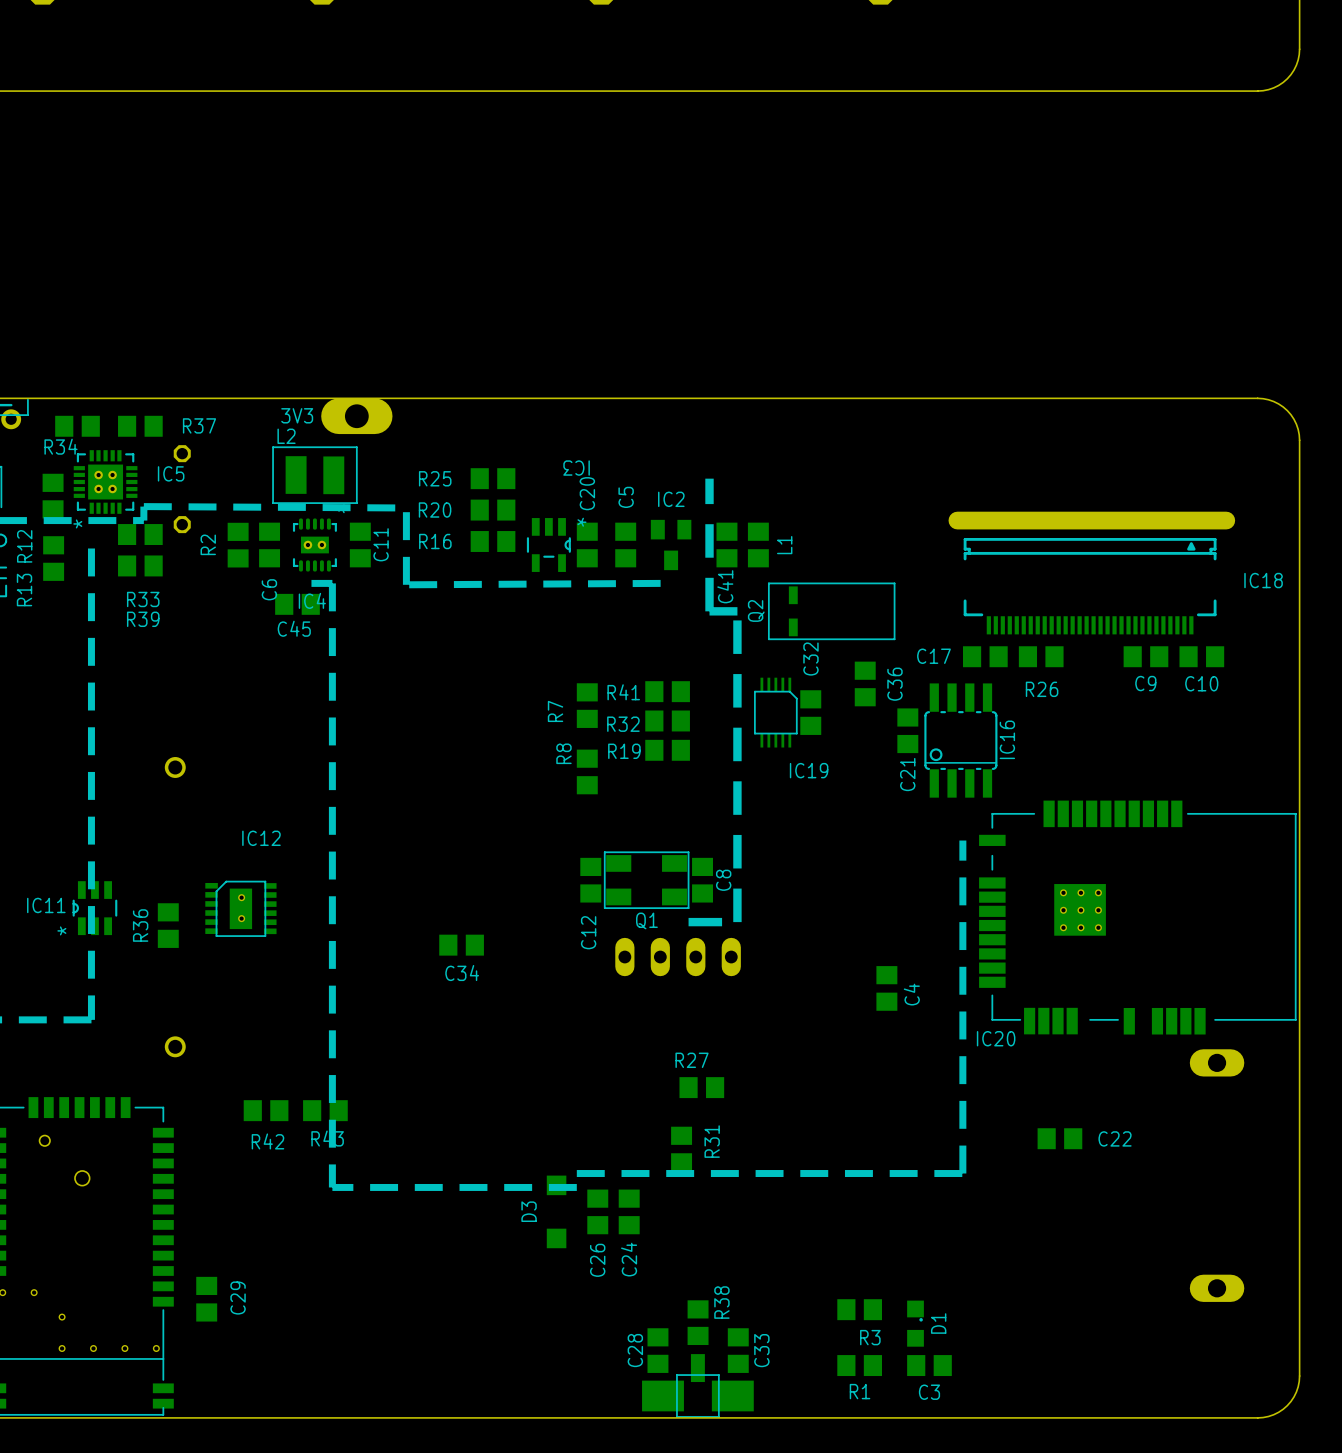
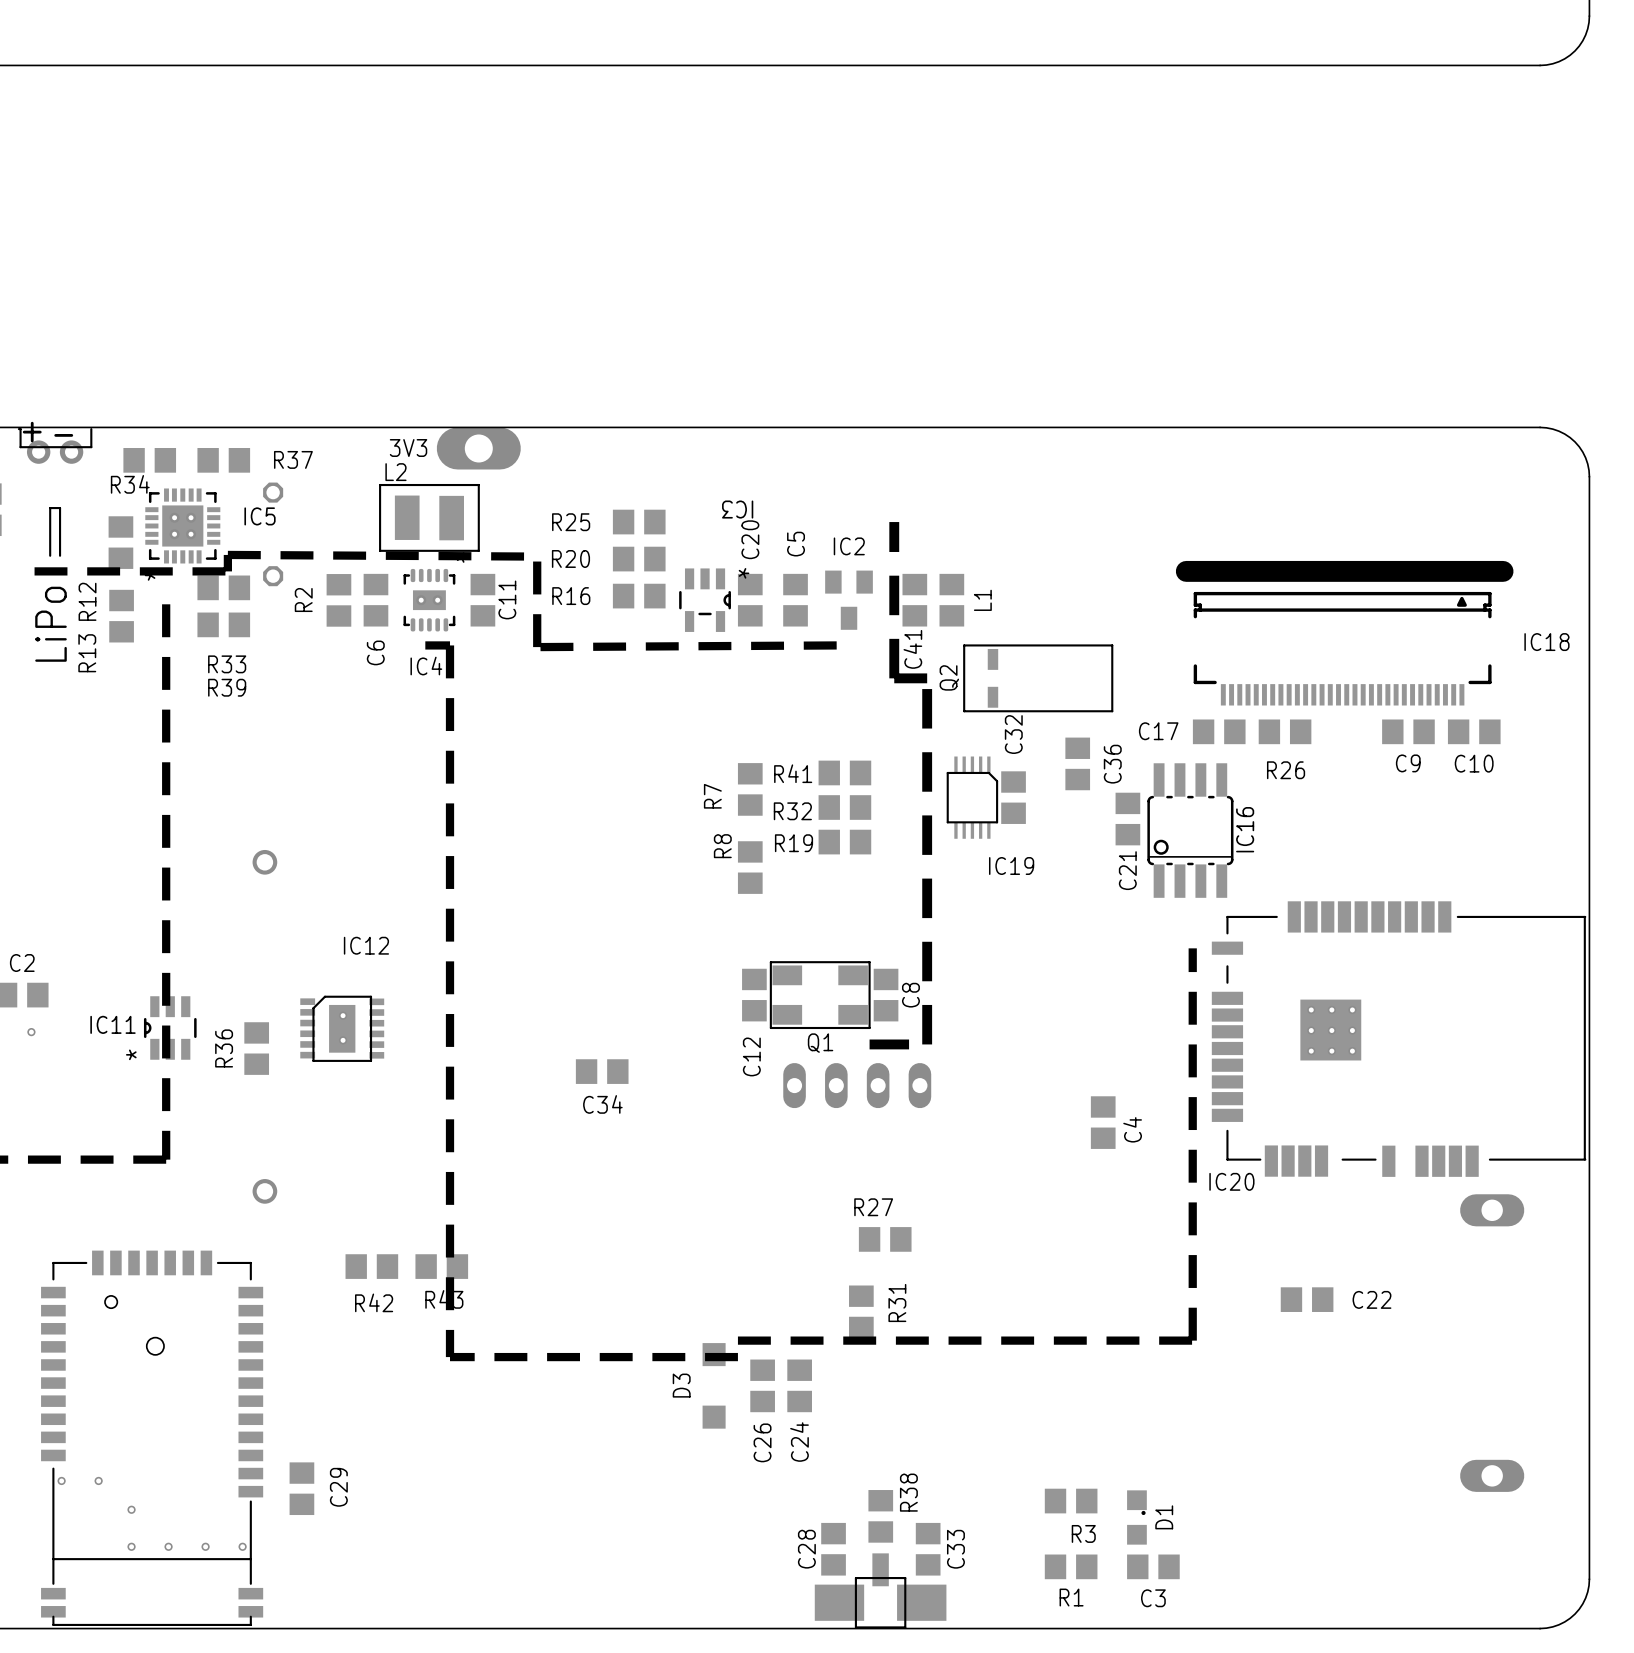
C45: (297, 604) -> none

